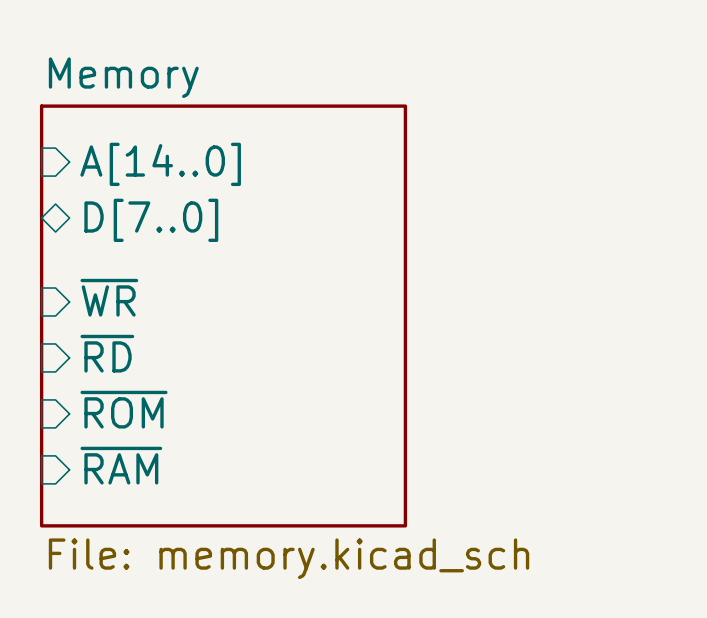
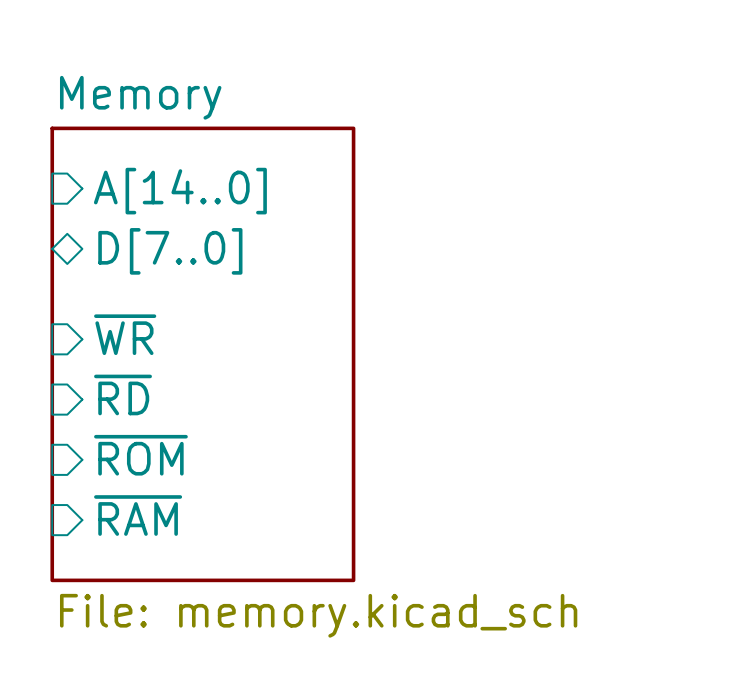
sheet Memory: none -> File: memory.kicad_sch (202, 354)
sheet Memory: File: memory.kicad_sch (223, 315) -> none

